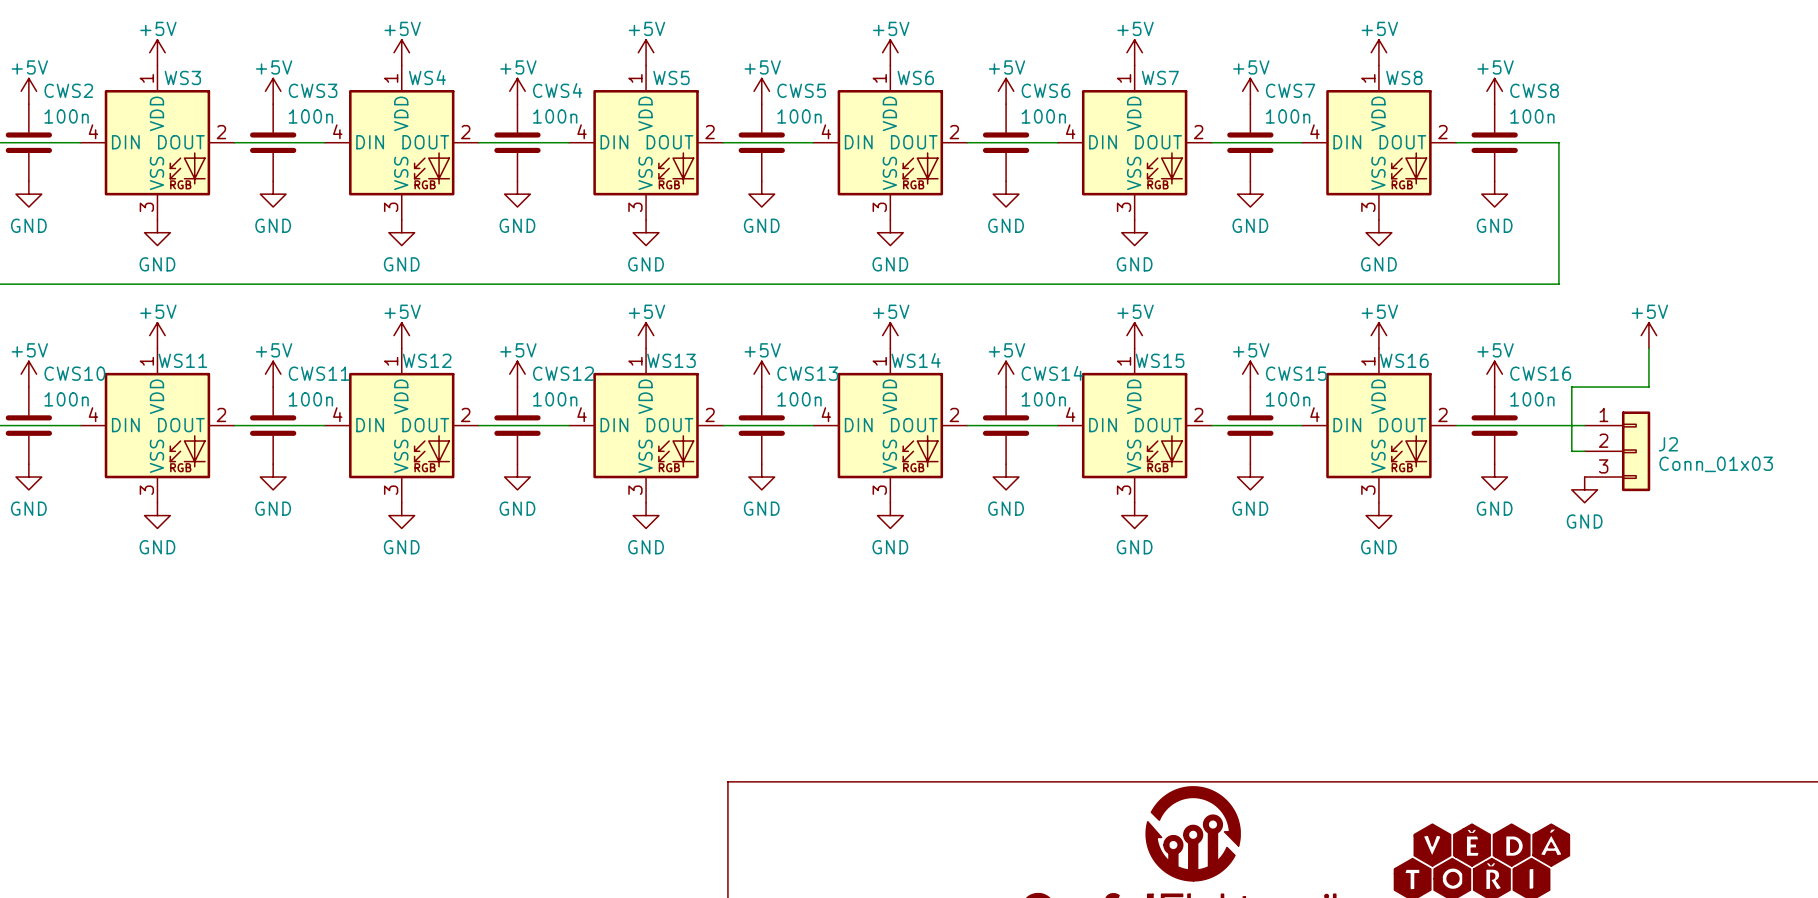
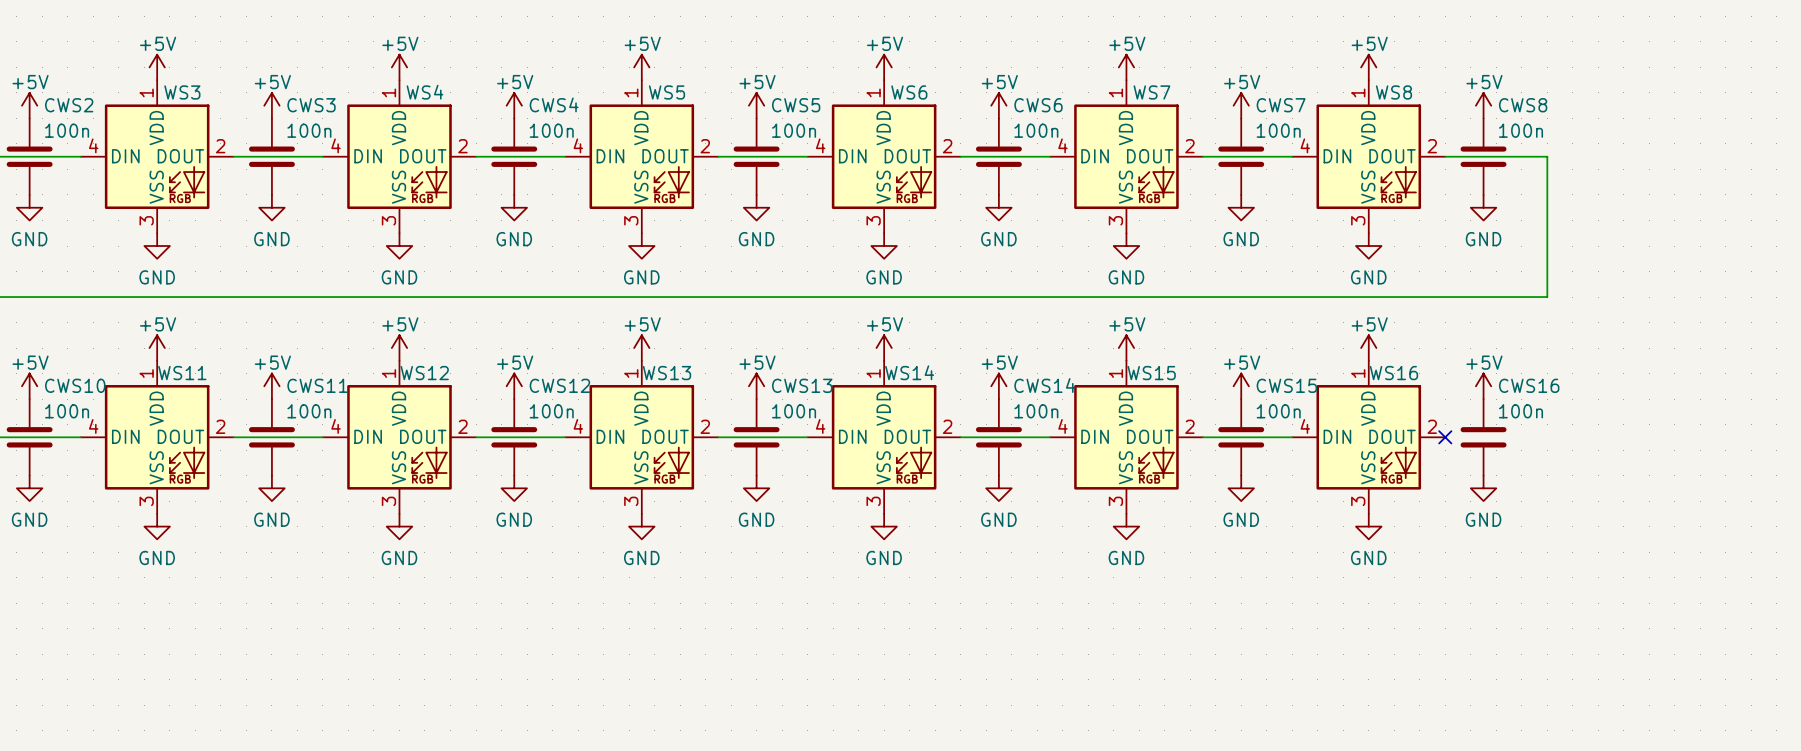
power symbol: +5V (1648, 335) -> none
wire: (1648, 348) (1648, 387) (1571, 387) (1571, 451) (1584, 451) -> none
wire: (1456, 425) (1584, 425) -> none
no-connect mark: none -> (1445, 437)
J2: Conn_01x03 (1617, 451) -> none
power symbol: GND (1584, 489) -> none

